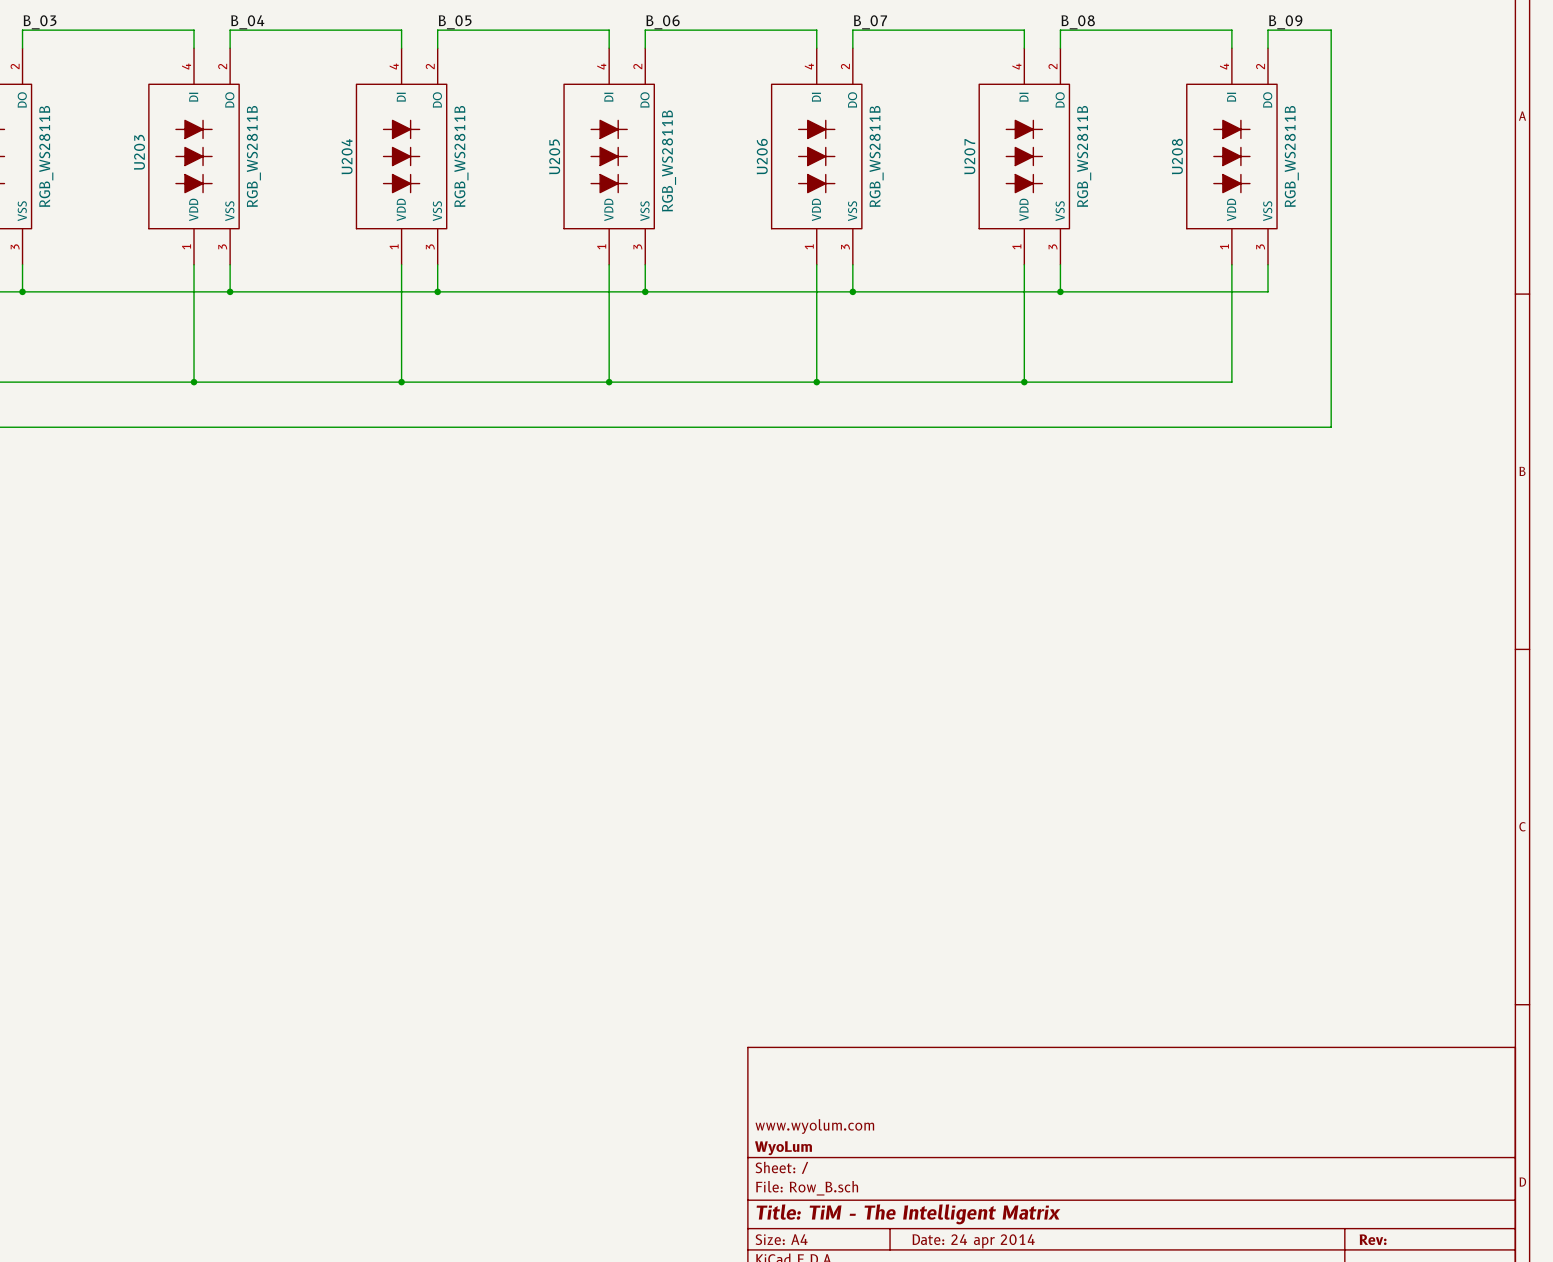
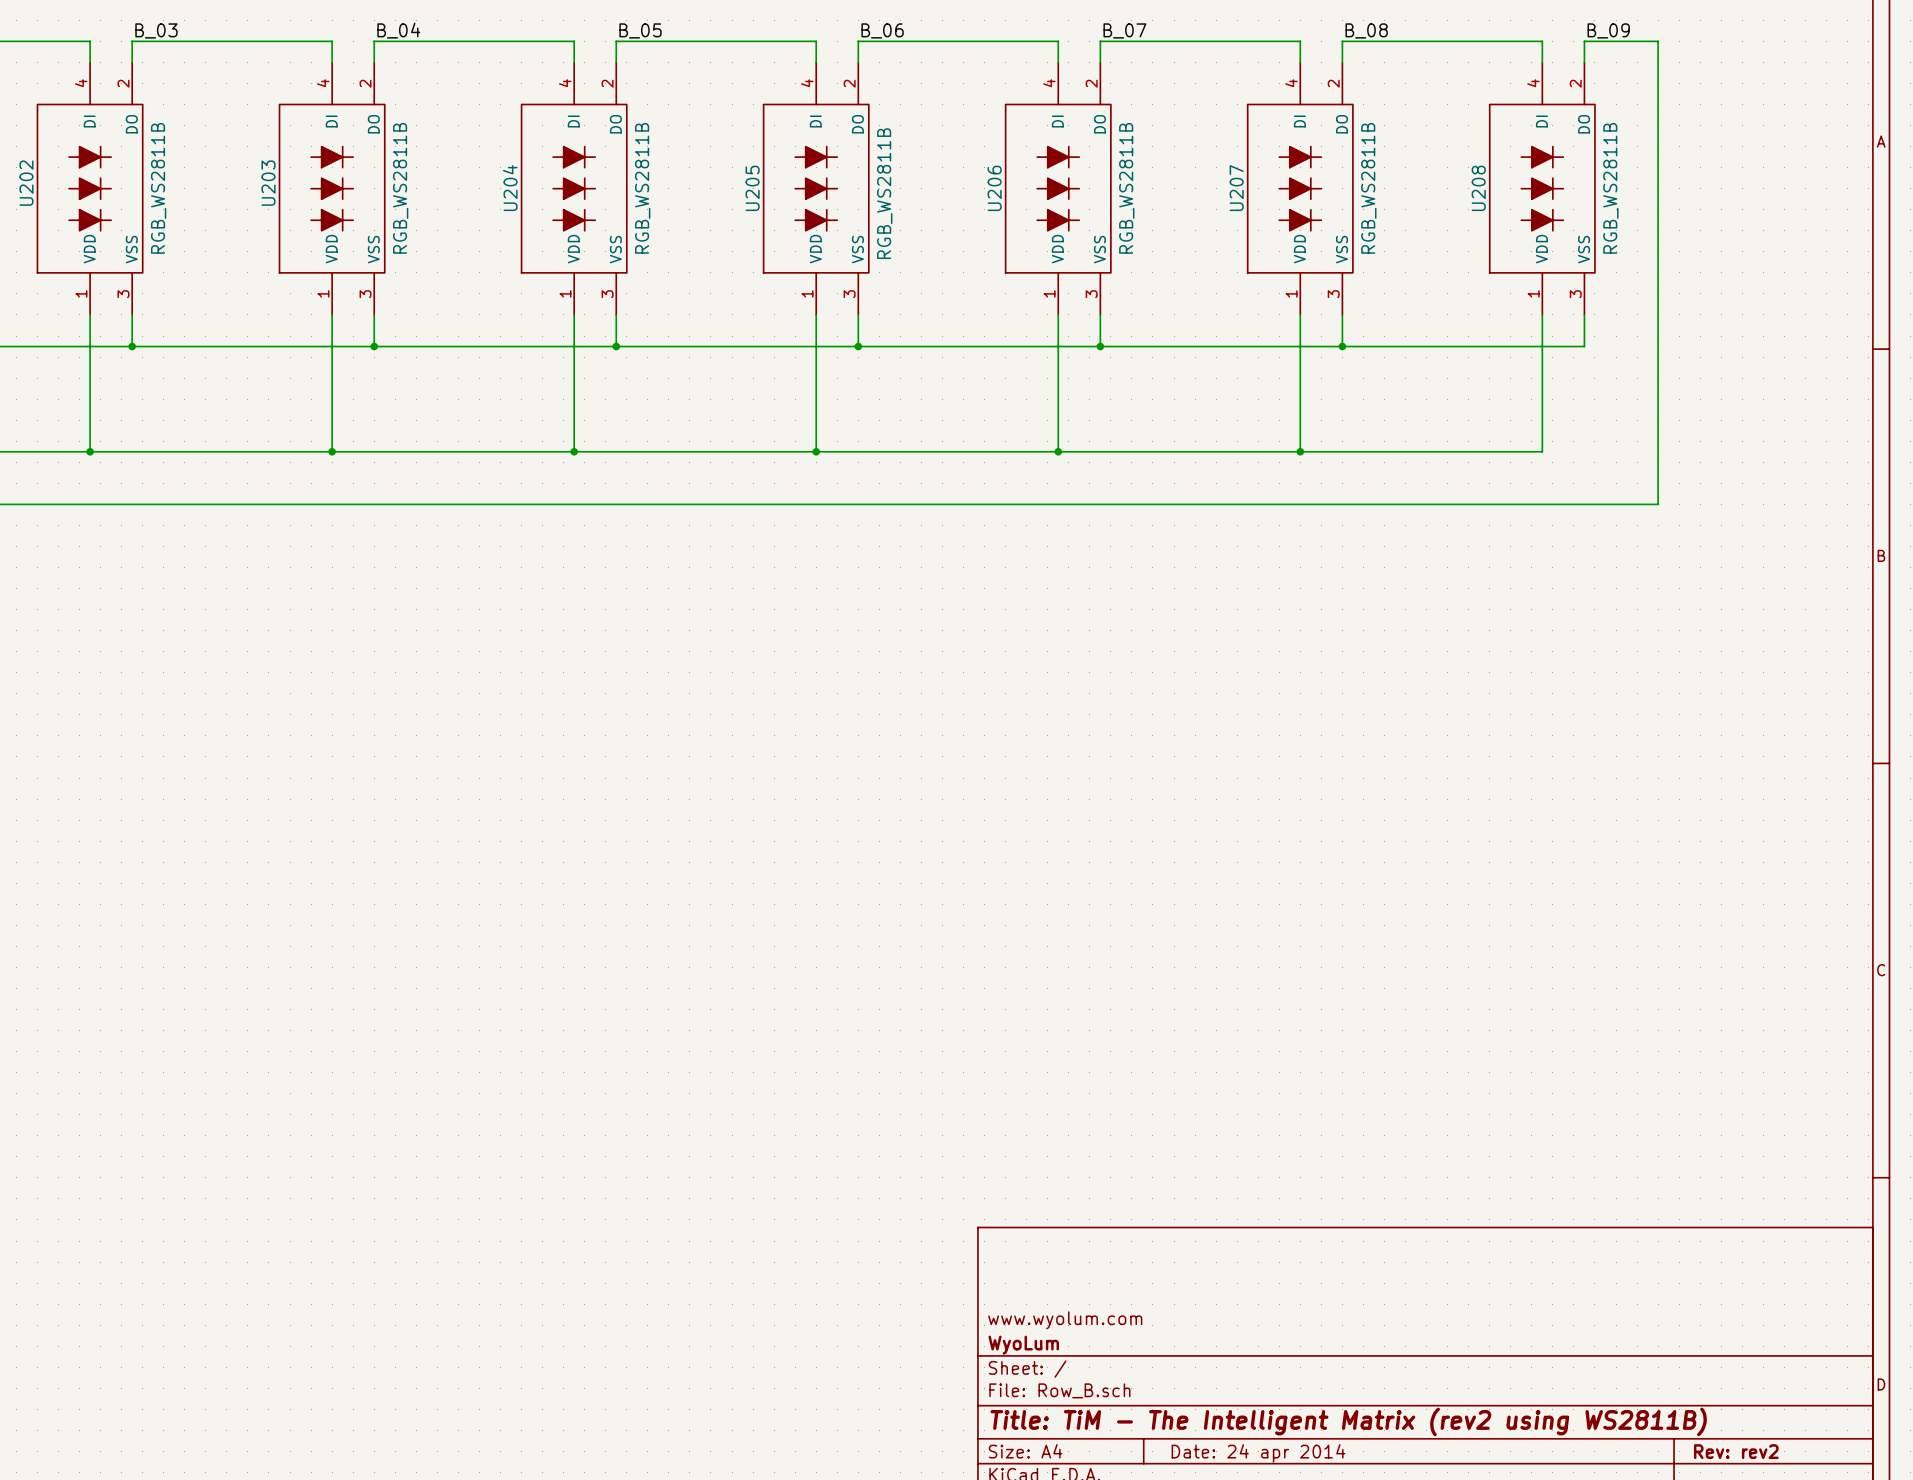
title block: Title: TiM - The Intelligent Matrix (908, 1214) -> Title: TiM - The Intelligent Matrix (rev2 using WS2811B) (1348, 1421)
title block: Rev: (1373, 1239) -> Rev: rev2 (1736, 1451)

